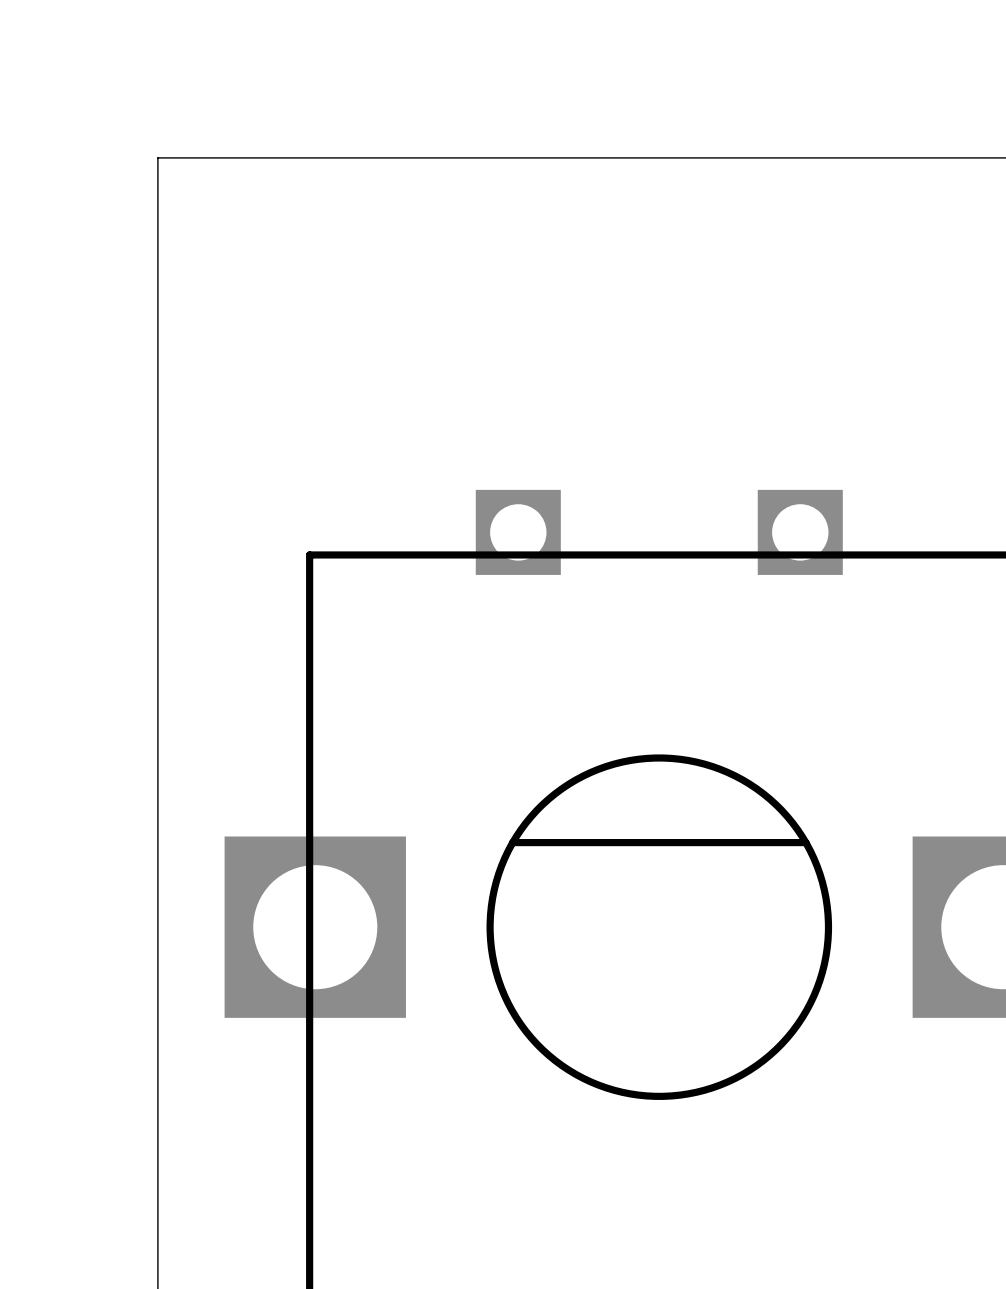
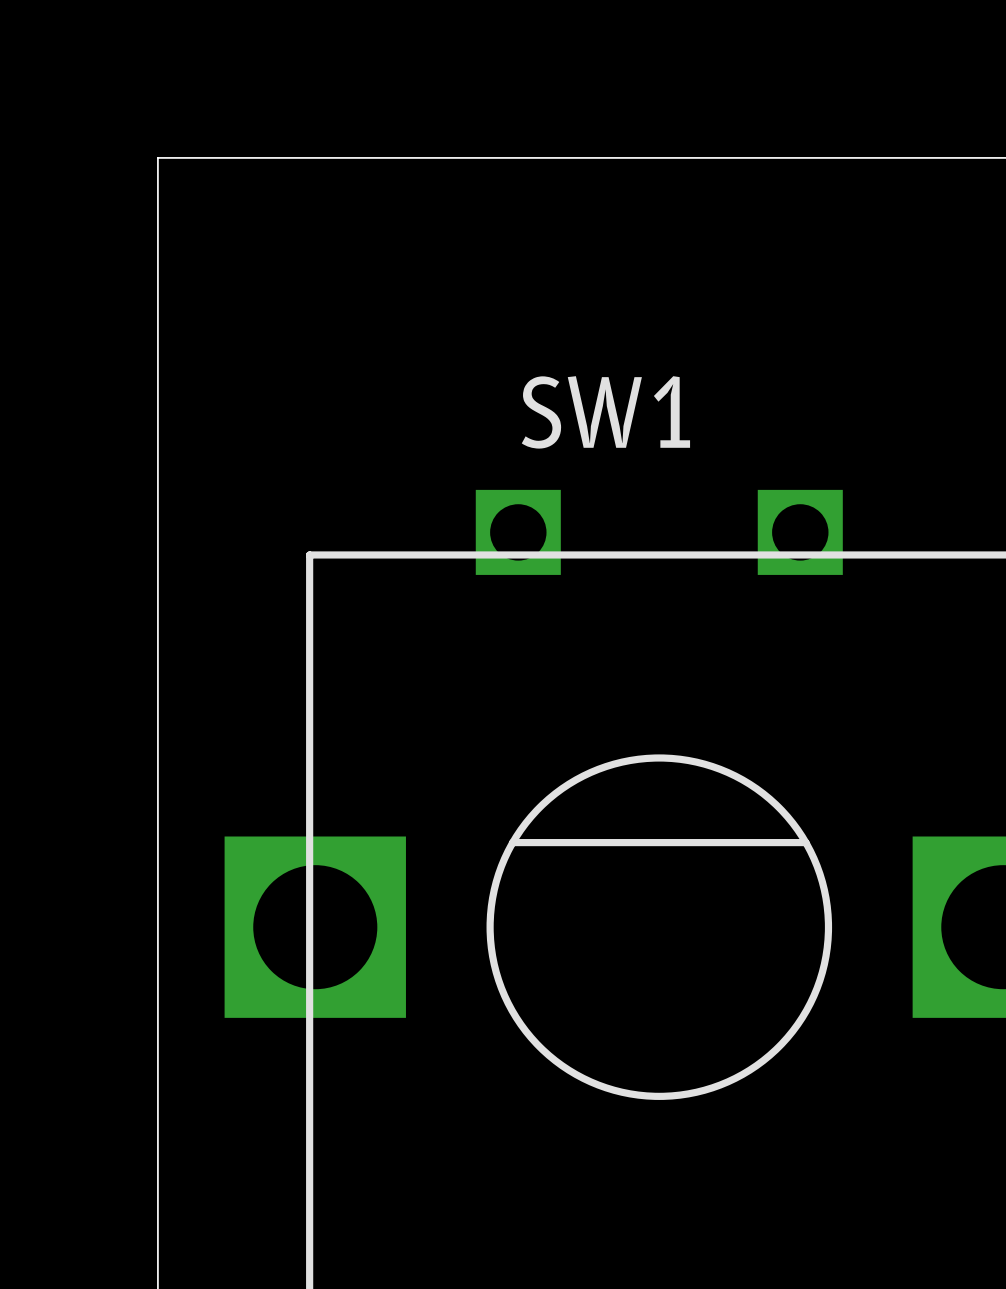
SW1 name: none -> SW1 (605, 412)

